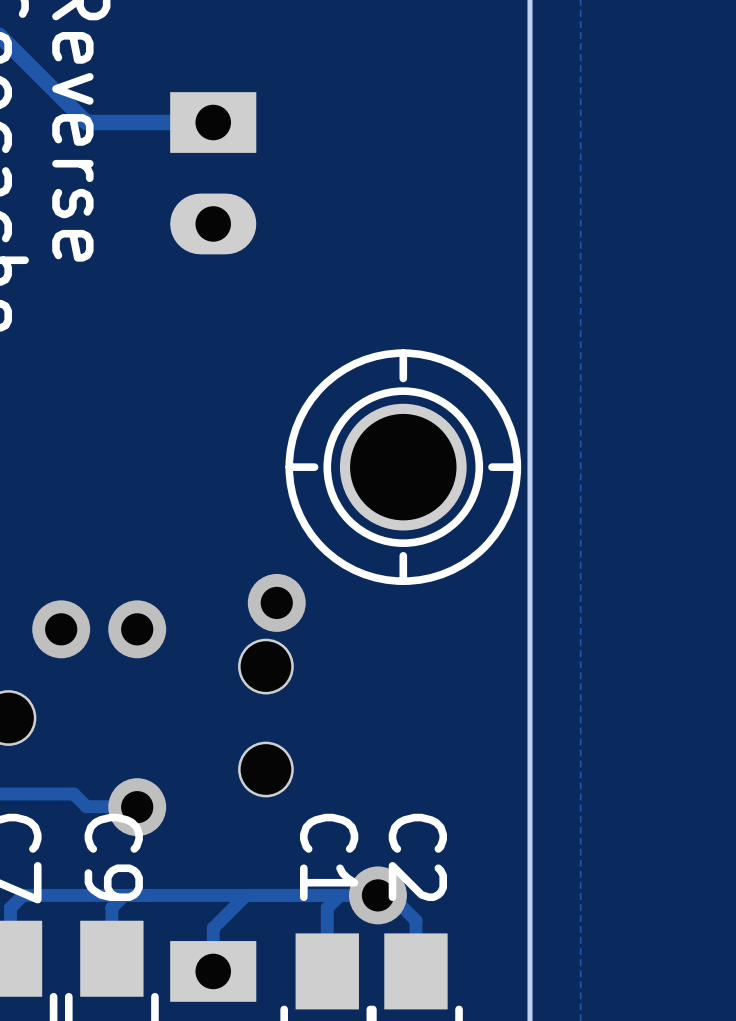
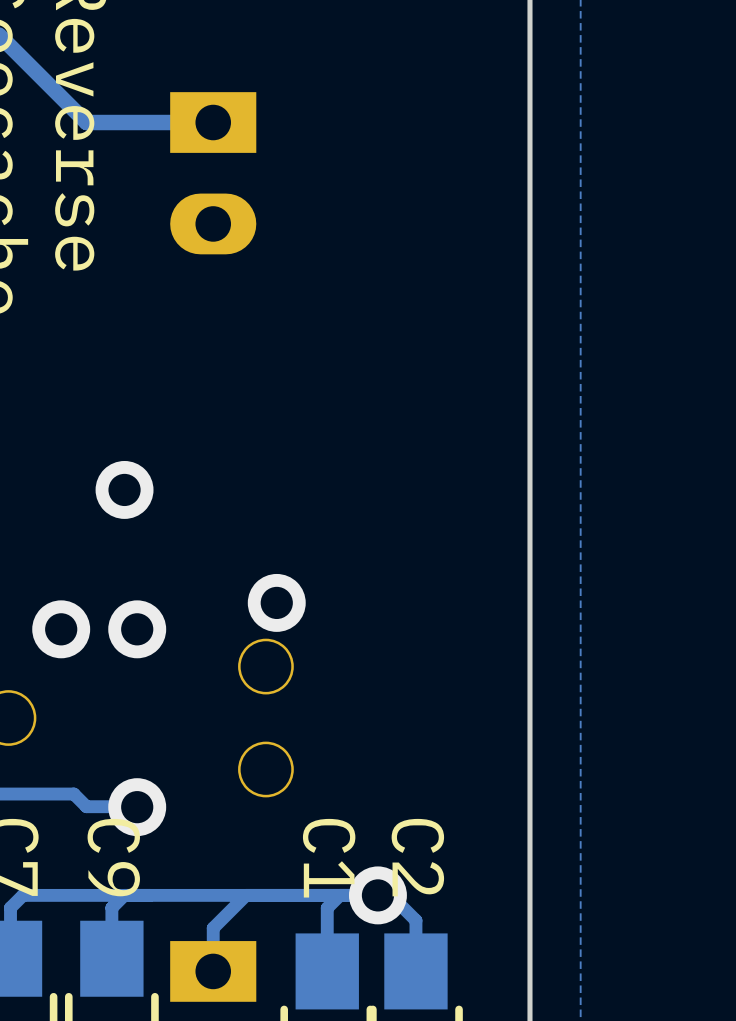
part: (403, 467) -> none
via: none -> (124, 489)

